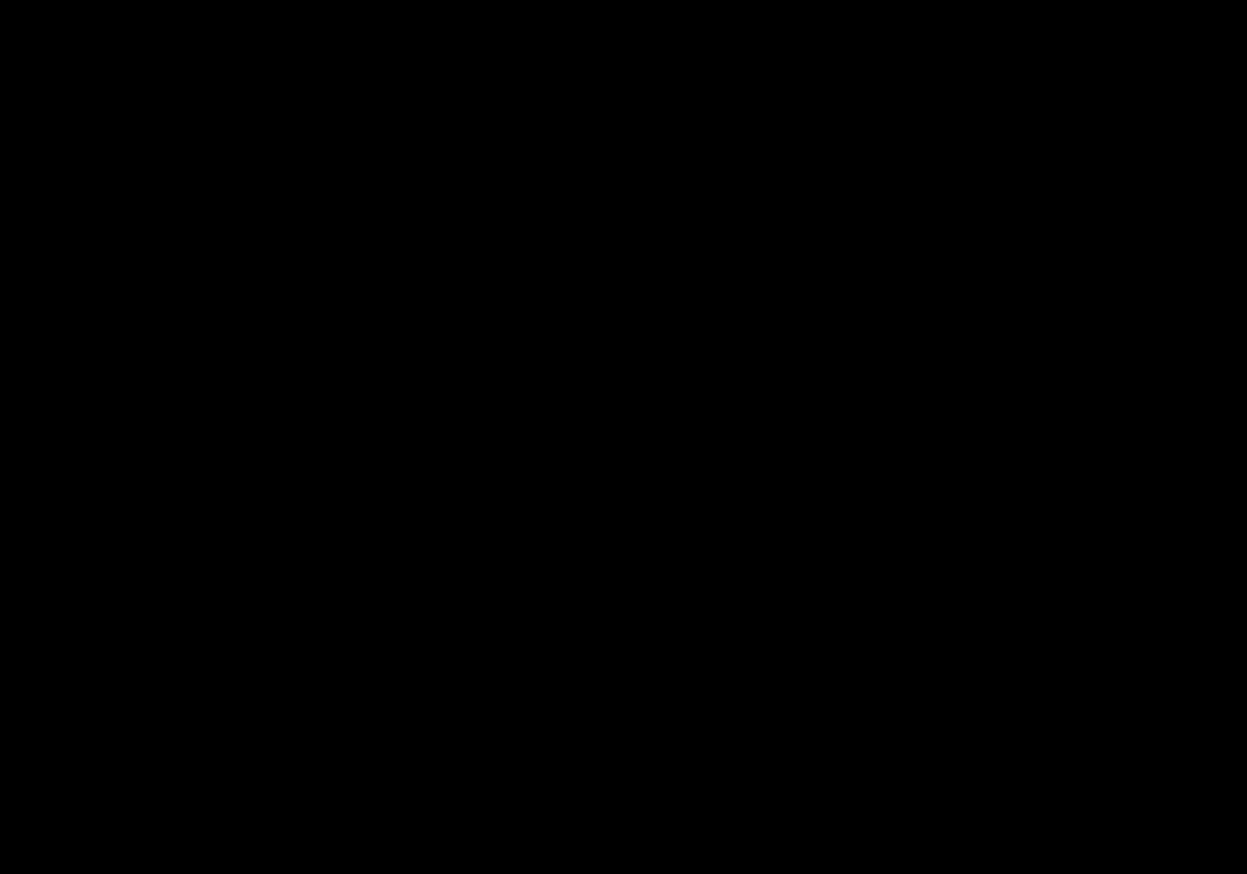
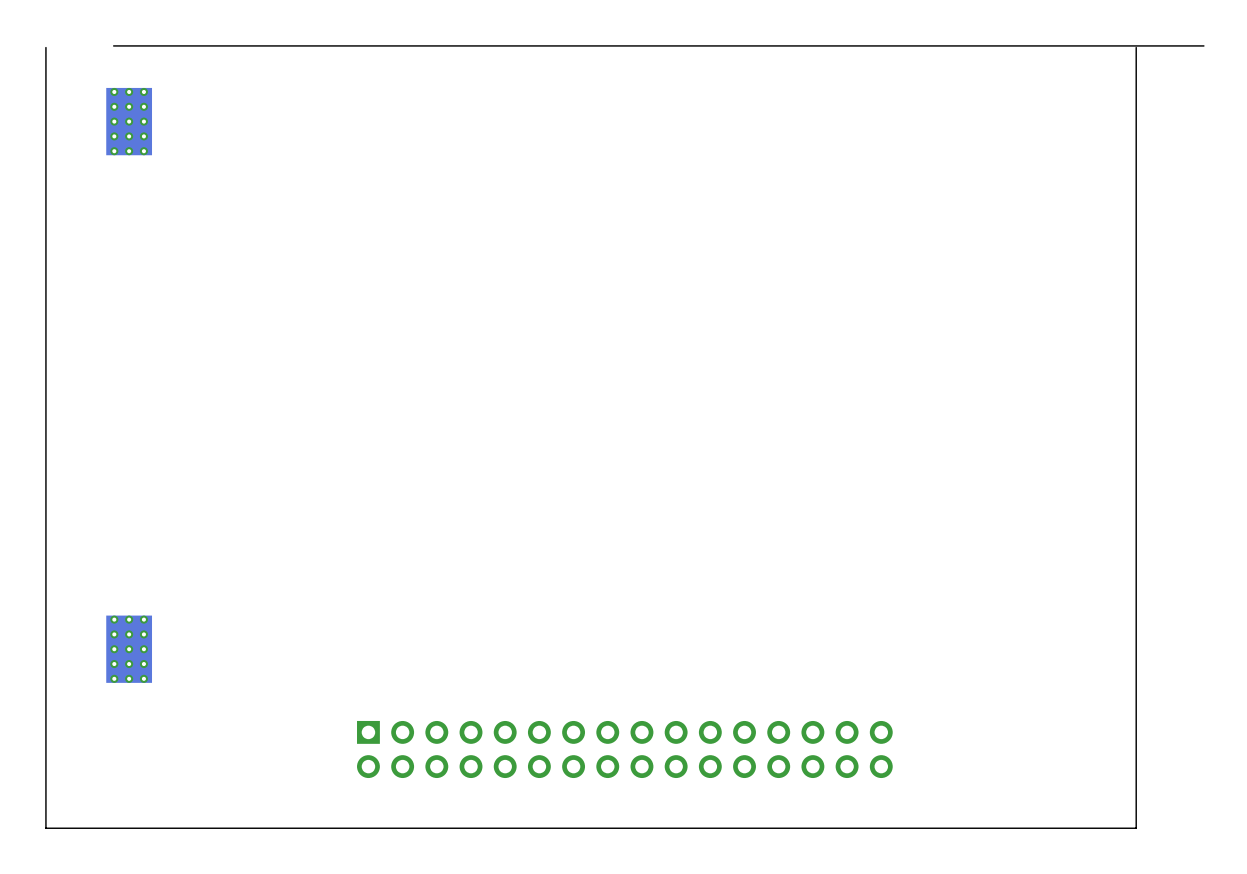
board edge: none -> (1203, 45) (113, 45)
board edge: none -> (1136, 47) (1136, 828) (45, 828) (45, 47)
part: none -> (129, 121)
part: none -> (129, 649)
part: none -> (624, 749)

